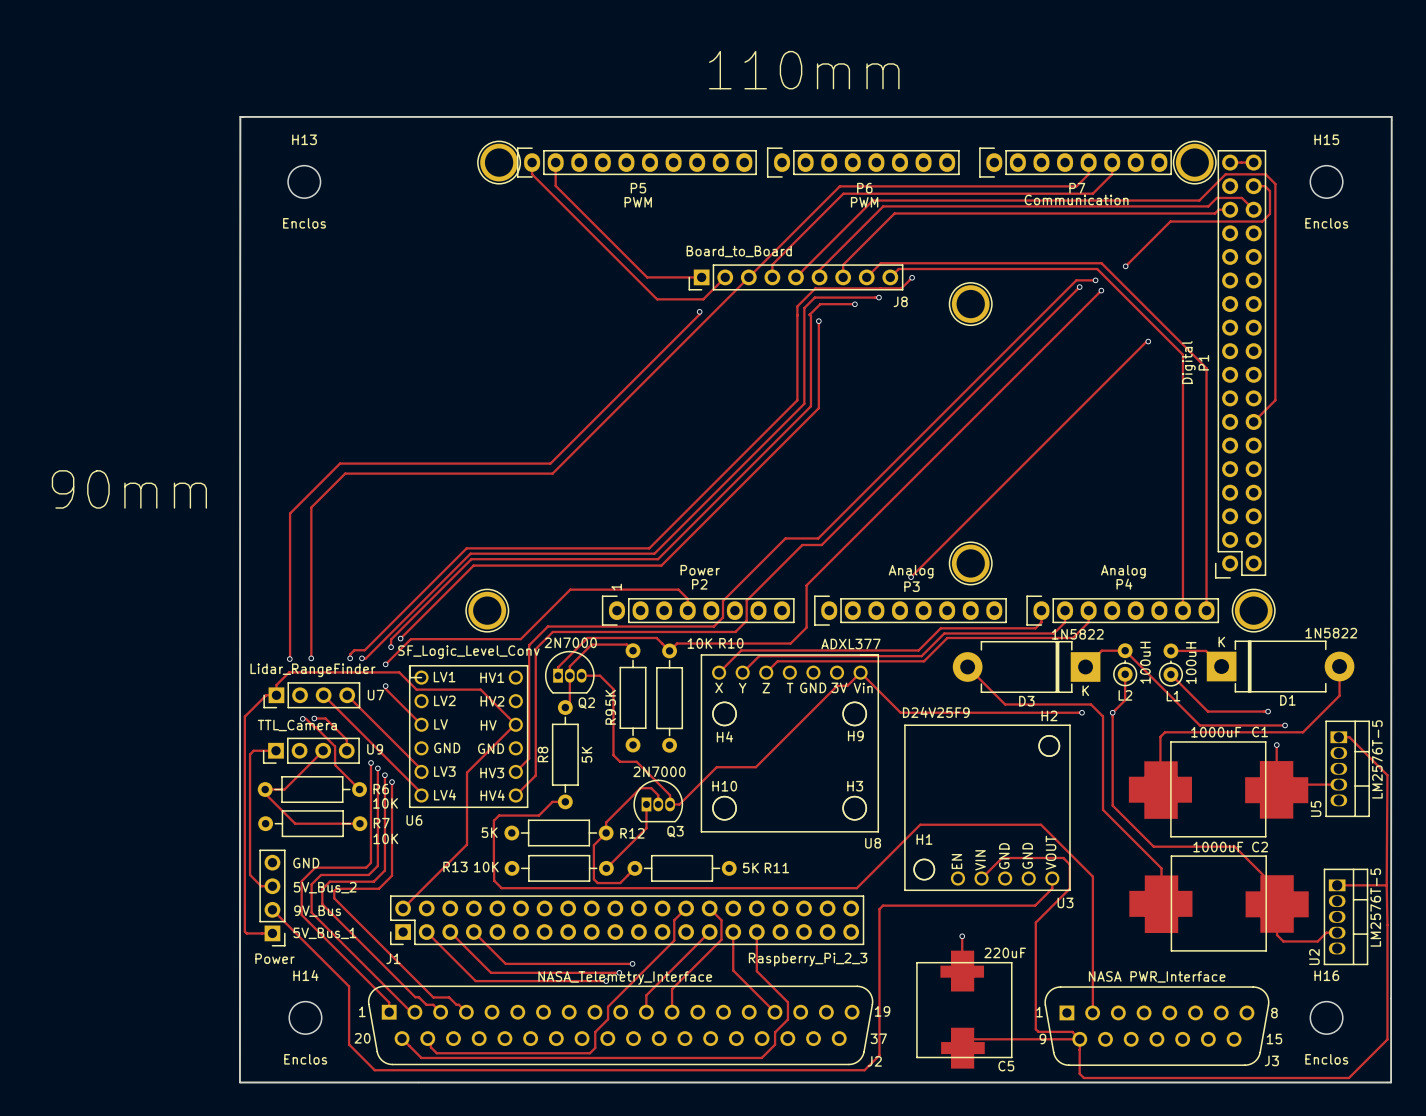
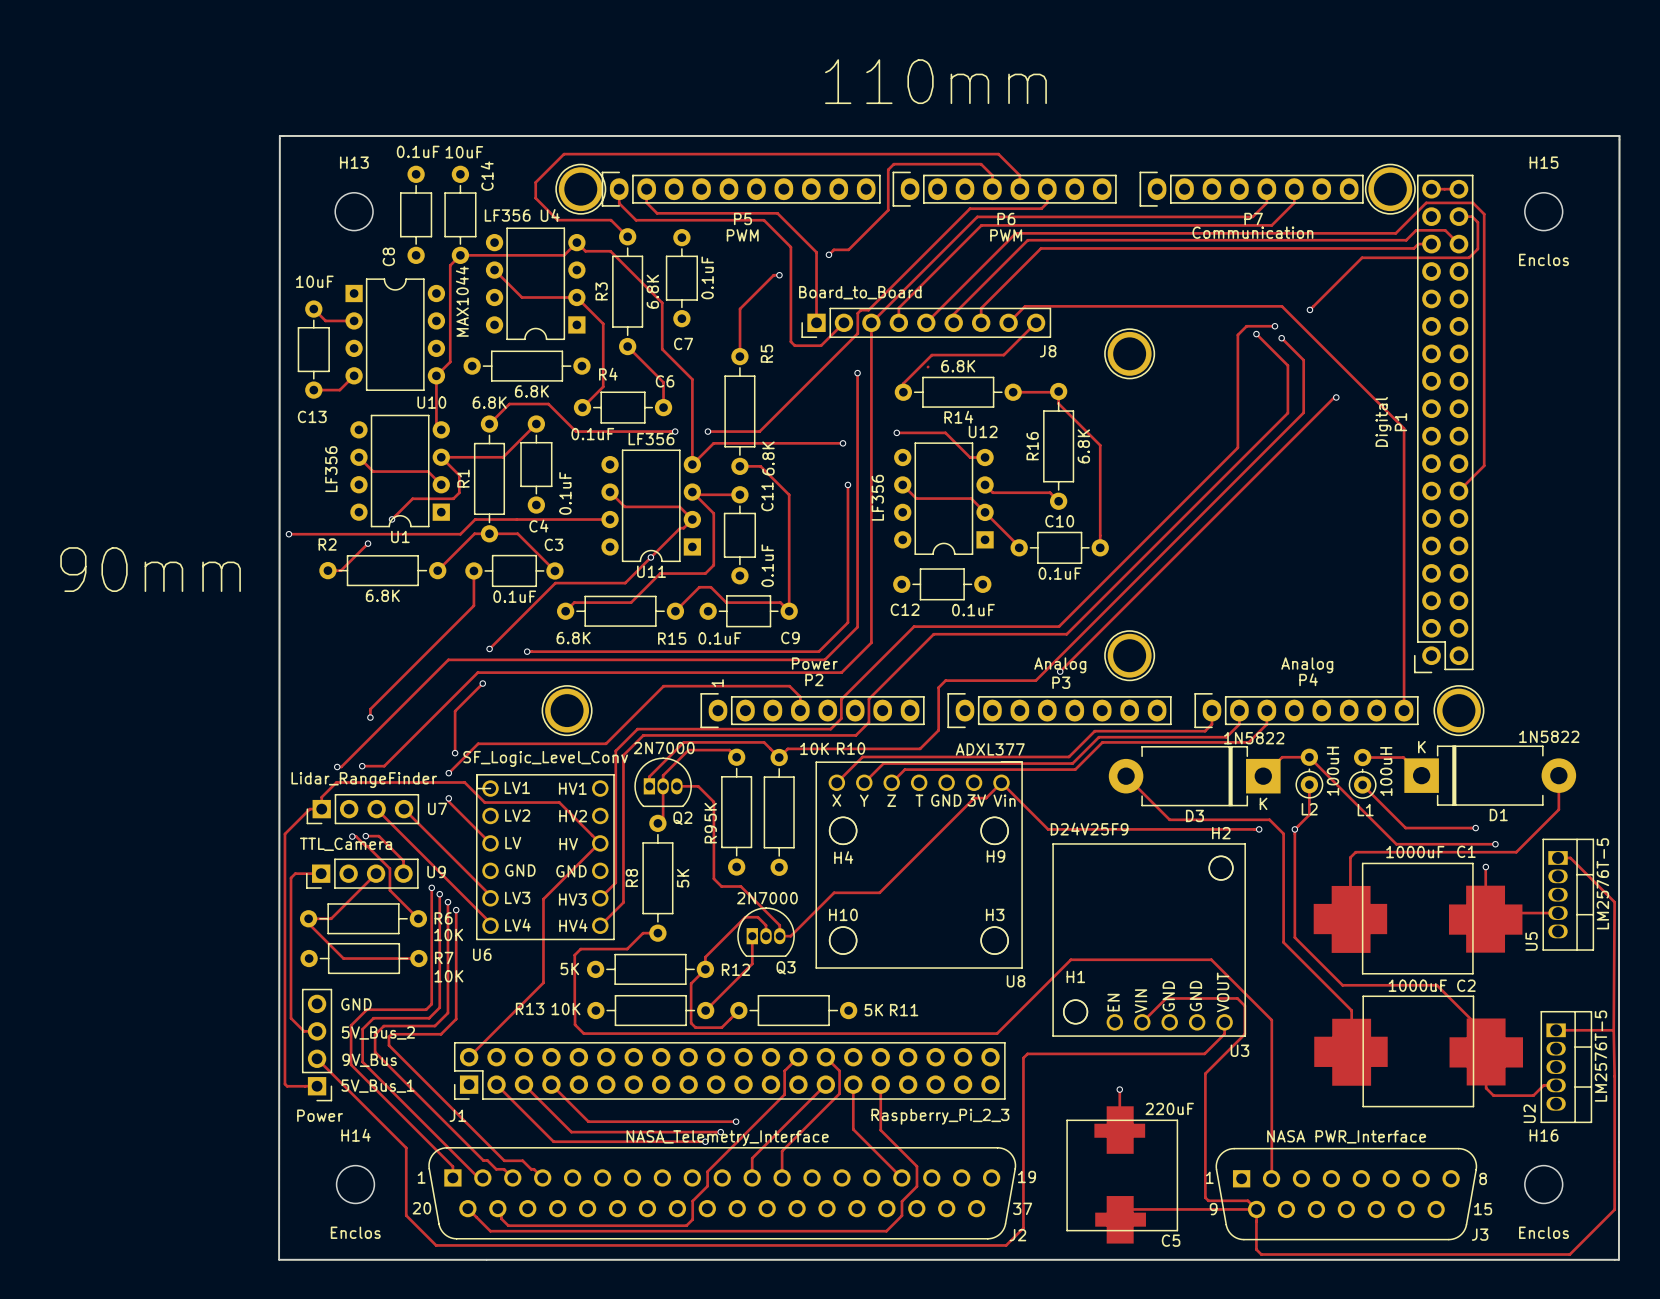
track: none -> (992, 189) (992, 175) (981, 164) (893, 164) (888, 169) (888, 210) (848, 249) (833, 249) (828, 254)
track: none -> (1019, 189) (1019, 175) (998, 154) (564, 154) (535, 182) (535, 198) (557, 220) (611, 220) (627, 236)
track: none -> (1047, 189) (1047, 202) (1041, 208) (970, 208) (868, 310) (860, 310) (857, 313) (857, 333) (759, 431) (707, 431)
track: (532, 174) (657, 299) (703, 299) (705, 297) -> (619, 202) (636, 220) (764, 220) (790, 247) (790, 341) (794, 345) (821, 345)
track: (555, 174) (555, 185) (647, 277) (701, 277) -> (646, 202) (657, 213) (777, 213) (816, 252) (816, 322)
C8: none -> 0.1uF (416, 214)
C14: none -> 10uF (460, 214)
via: none -> (828, 254)
H13 value: Enclos (304, 223) -> none
track: none -> (494, 270) (521, 297) (576, 297) (603, 323) (603, 386) (582, 407)
track: none -> (779, 275) (773, 275) (740, 308) (740, 356)
via: none -> (779, 275)
C7: none -> 0.1uF (681, 278)
U4: none -> LF356 (535, 283)
R3: none -> 6.8K (627, 291)
track: none -> (313, 309) (325, 320) (354, 320)
track: (748, 277) (552, 473) (345, 473) (311, 507) (311, 658) -> (871, 322) (871, 642) (841, 672) (477, 672) (384, 766) (362, 766)
track: (890, 277) (898, 269) (1097, 269) (1182, 354) (1182, 610) -> (1036, 322) (1003, 355) (931, 355) (903, 383) (903, 392)
track: (912, 277) (901, 288) (880, 288) -> none
via: (912, 277) -> none
track: (1076, 280) (818, 538) -> (1252, 326) (1246, 326) (1237, 334) (1237, 447) (1059, 626) (952, 626)
U10: none -> MAX1044 (395, 334)
track: (1079, 287) (821, 545) -> (1256, 334) (1287, 365) (1287, 413) (1066, 634) (956, 634)
track: (880, 288) (815, 288) (797, 306) (797, 400) (649, 548) (466, 548) (364, 650) (354, 650) (350, 654) (350, 658) -> none
track: (1101, 290) (806, 585) (806, 590) -> (1281, 338) (1303, 360) (1303, 412) (1035, 680) (945, 680) (938, 687)
track: none -> (627, 346) (663, 382) (663, 407)
track: (878, 297) (814, 297) (804, 308) (804, 403) (654, 553) (470, 553) (365, 658) (361, 658) -> none
via: (878, 297) -> none
C13: none -> 10uF (313, 349)
via: (854, 304) -> none
track: (855, 304) (820, 304) (809, 314) -> none
track: (699, 311) (699, 314) (550, 463) (340, 463) (290, 513) (289, 659) -> (857, 373) (857, 627) (824, 659) (448, 659) (341, 766) (337, 766)
via: (699, 311) -> none
R4: none -> 6.8K (527, 366)
track: (809, 314) (810, 406) (658, 559) (471, 559) (391, 639) -> (482, 683) (455, 711) (455, 744)
via: none -> (857, 373)
track: (818, 321) (818, 408) (661, 565) (473, 565) (400, 638) -> none
via: (818, 321) -> none
track: none -> (354, 375) (339, 390) (313, 390)
R14: none -> 6.8K (958, 392)
track: none -> (1013, 392) (1058, 391) (1058, 403) (1100, 445) (1100, 547)
C6: none -> 0.1uF (623, 407)
R5: none -> 6.8K (739, 411)
track: none -> (489, 424) (509, 404) (548, 404) (576, 431) (675, 431)
track: none -> (536, 424) (503, 457) (441, 457) (459, 475) (459, 492) (453, 498) (412, 498) (392, 519)
track: none -> (441, 429) (436, 424) (436, 375) (450, 362) (450, 265) (460, 255) (564, 255) (576, 242) (585, 251) (610, 251) (662, 302) (662, 349) (692, 379) (692, 464) (713, 443) (842, 443)
via: none -> (675, 431)
via: none -> (707, 431)
track: none -> (896, 432) (945, 432) (970, 457) (985, 457)
via: none -> (896, 432)
via: none -> (842, 443)
R16: none -> 6.8K (1058, 446)
track: none -> (358, 457) (373, 471) (428, 471) (441, 484)
C4: none -> 0.1uF (536, 464)
track: none -> (739, 466) (760, 466) (789, 494) (789, 611) (780, 602) (726, 602) (710, 587) (699, 587) (675, 611)
U1: none -> LF356 (400, 471)
R1: none -> 6.8K (489, 478)
track: none -> (847, 484) (847, 622) (818, 651) (527, 651)
via: none -> (847, 484)
track: none -> (902, 484) (916, 498) (971, 498) (1019, 547)
track: none -> (985, 484) (992, 492) (1050, 492) (1058, 501)
track: none -> (610, 492) (624, 506) (679, 506) (692, 519) (683, 528) (680, 528) (625, 583) (555, 583) (489, 648)
track: none -> (692, 492) (713, 513) (713, 565) (705, 573) (660, 573) (631, 602) (574, 602) (565, 611)
track: none -> (695, 494) (739, 494)
U12: none -> LF356 (943, 498)
U11: none -> LF356 (651, 505)
via: none -> (392, 519)
track: none -> (610, 519) (475, 519) (460, 534) (288, 534)
via: none -> (288, 534)
C11: none -> 0.1uF (739, 535)
track: none -> (368, 543) (341, 570) (327, 570)
via: none -> (368, 543)
C10: none -> 0.1uF (1059, 547)
via: none -> (650, 557)
R2: none -> 6.8K (382, 570)
track: none -> (437, 570) (474, 533) (517, 533) (554, 570)
track: none -> (473, 570) (473, 605) (370, 709) (370, 717)
C3: none -> 0.1uF (514, 570)
C12: none -> 0.1uF (942, 584)
R15: none -> 6.8K (620, 611)
C9: none -> 0.1uF (748, 611)
via: none -> (489, 648)
via: none -> (527, 651)
via: none -> (482, 683)
via: none -> (370, 717)
via: (400, 638) -> none
via: (350, 658) -> none
via: (361, 658) -> none

